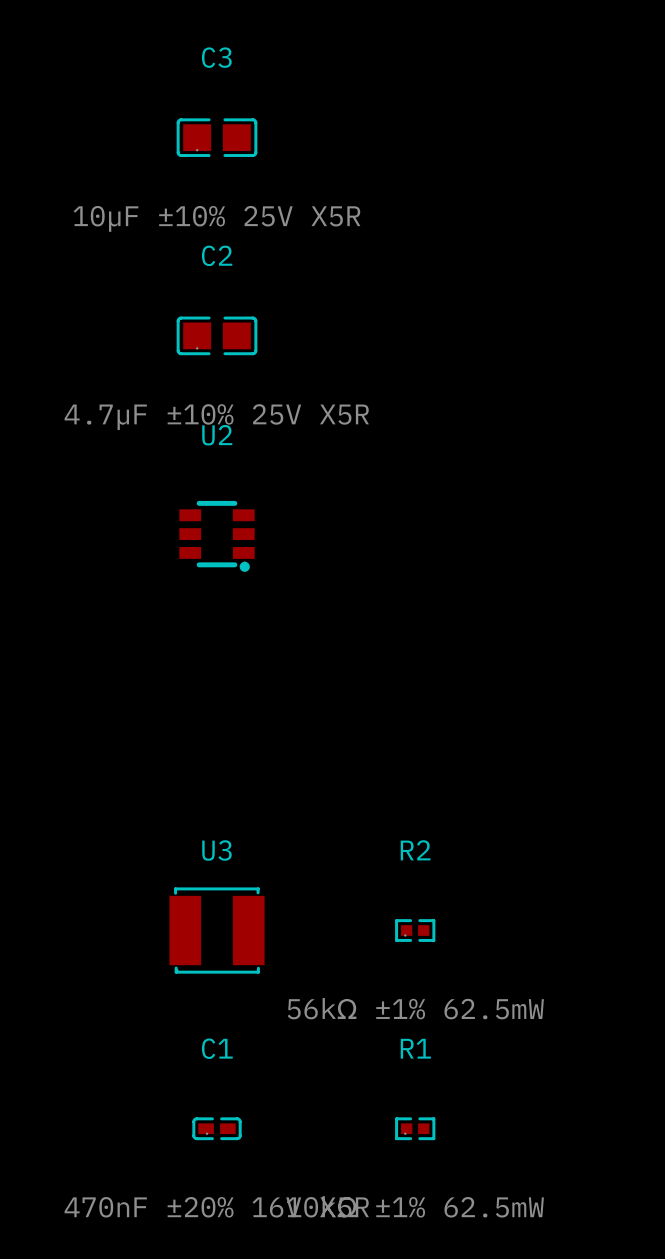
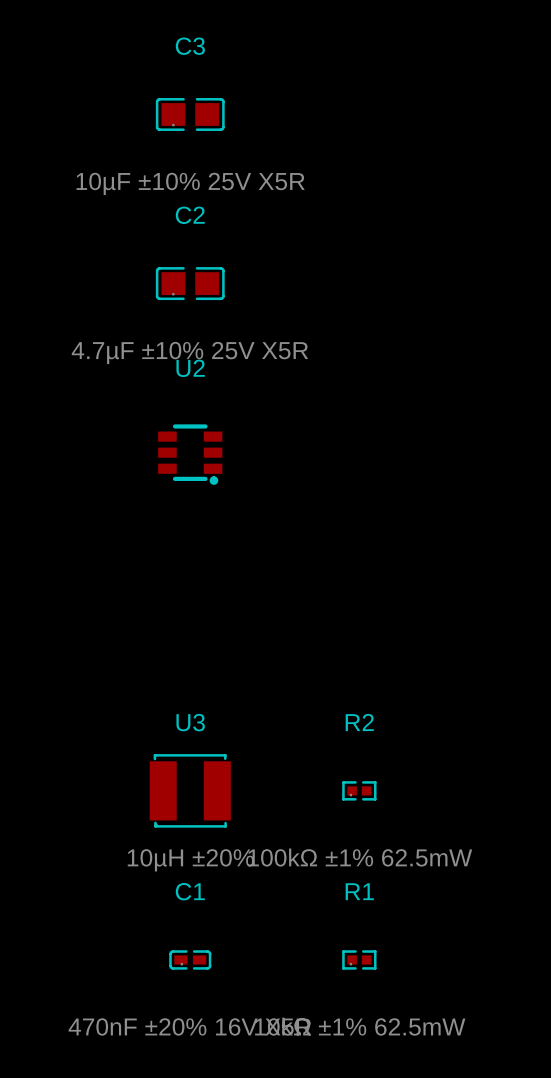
R2 value: 56kΩ ±1% 62.5mW (415, 1008) -> 100kΩ ±1% 62.5mW (360, 857)
U3 value: none -> 10µH ±20% (190, 860)

